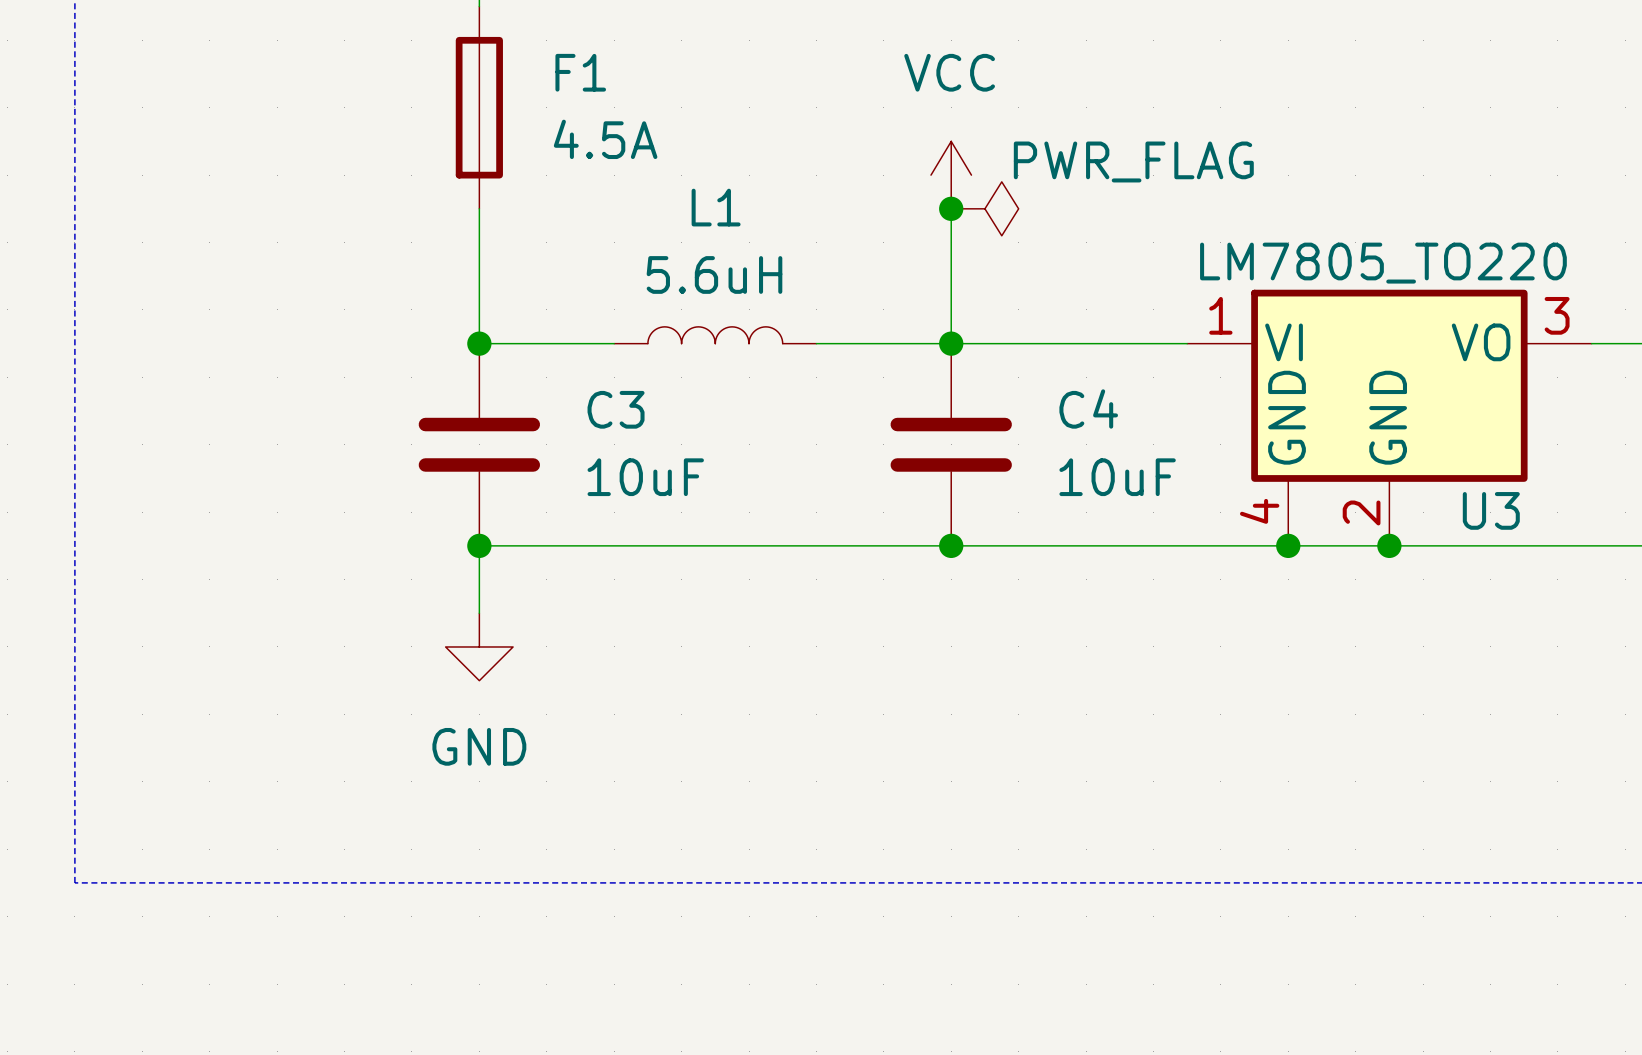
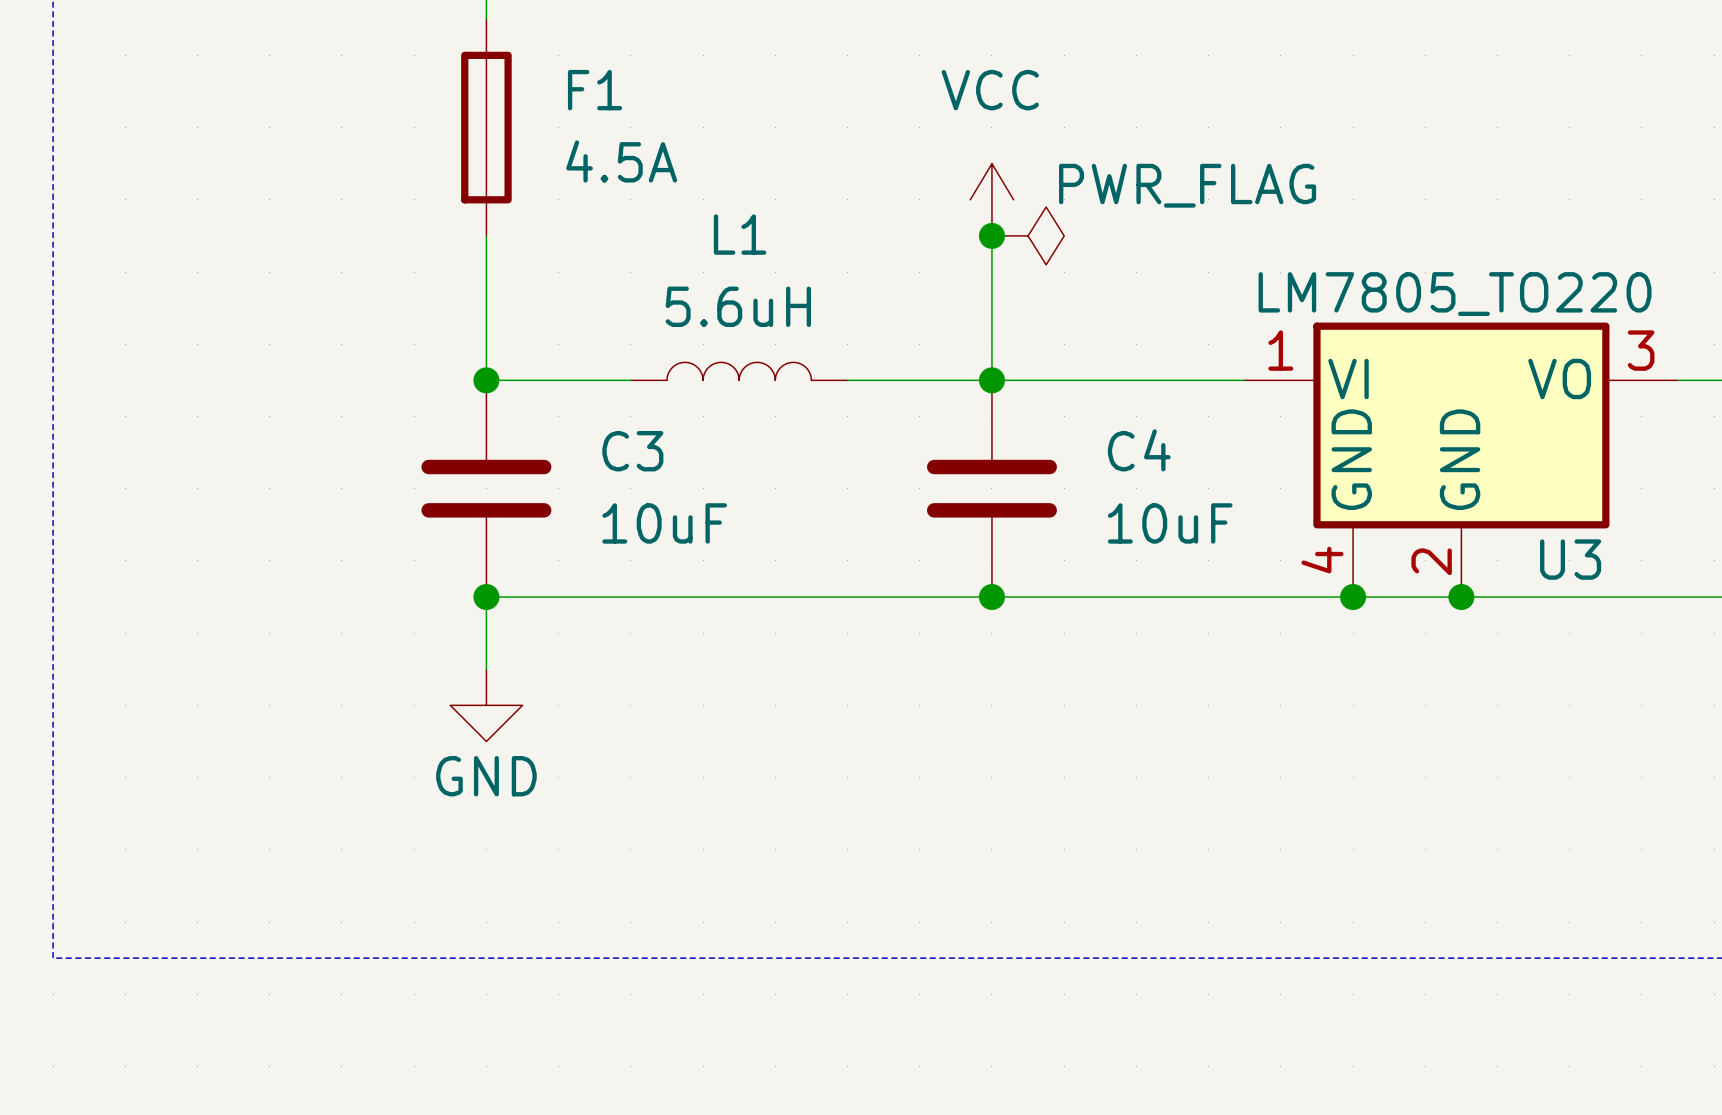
power symbol text position: GND (479, 746) -> GND (486, 776)

